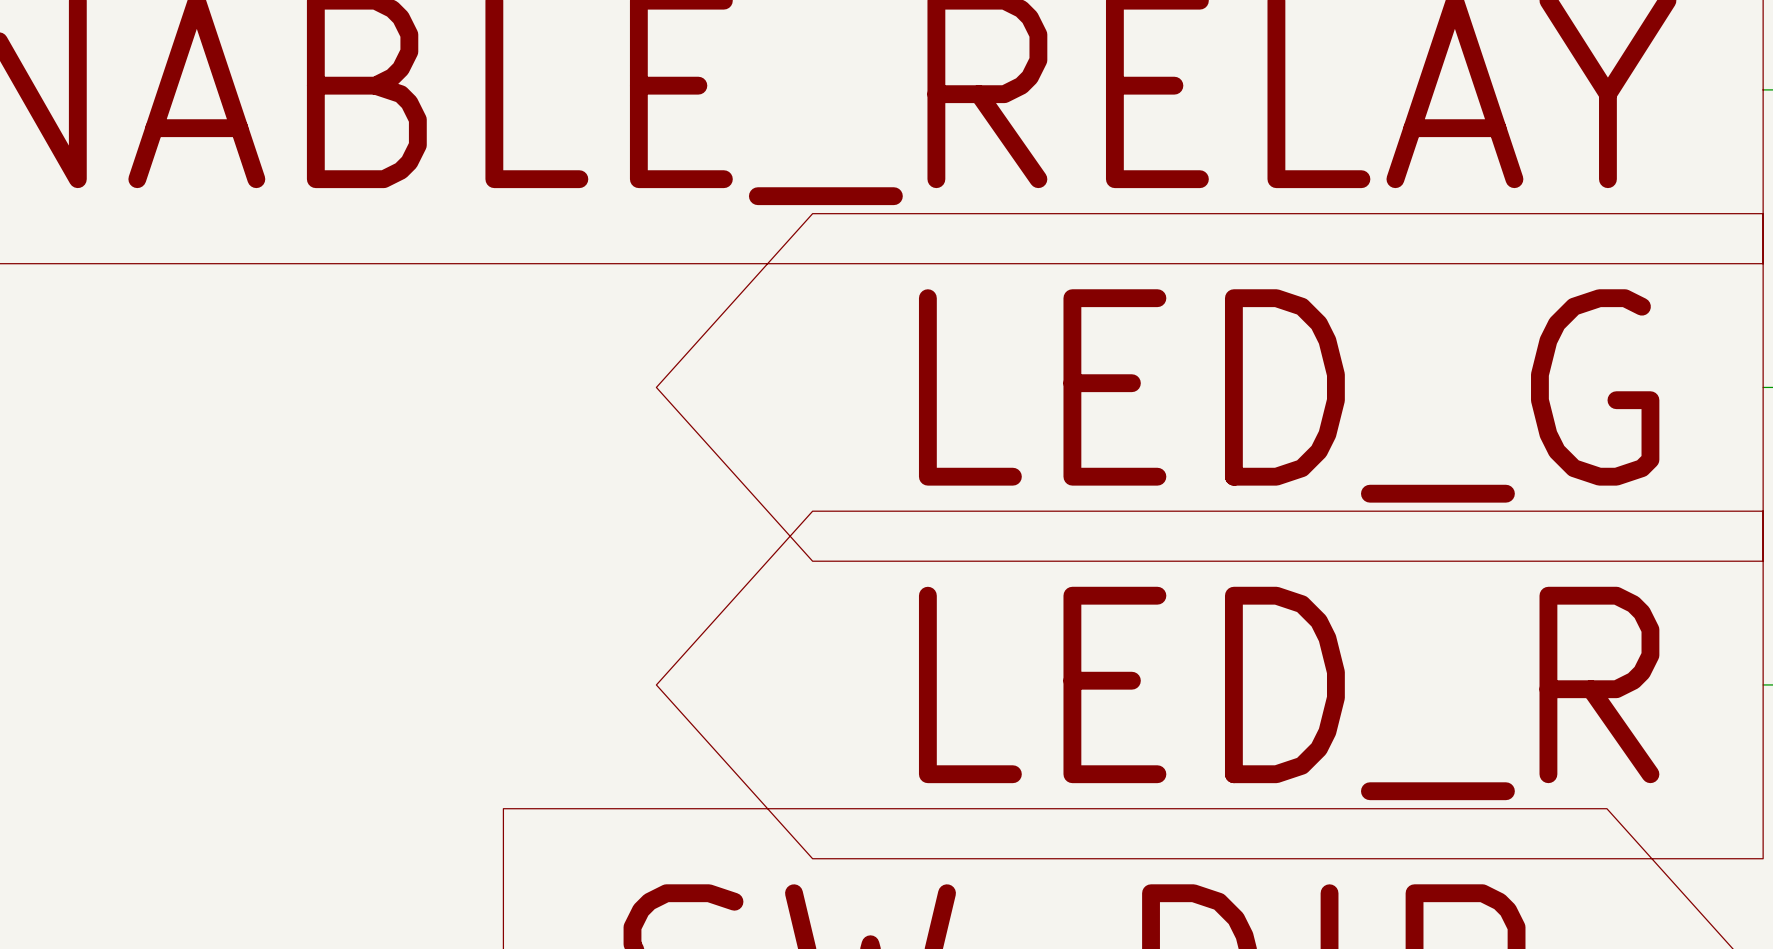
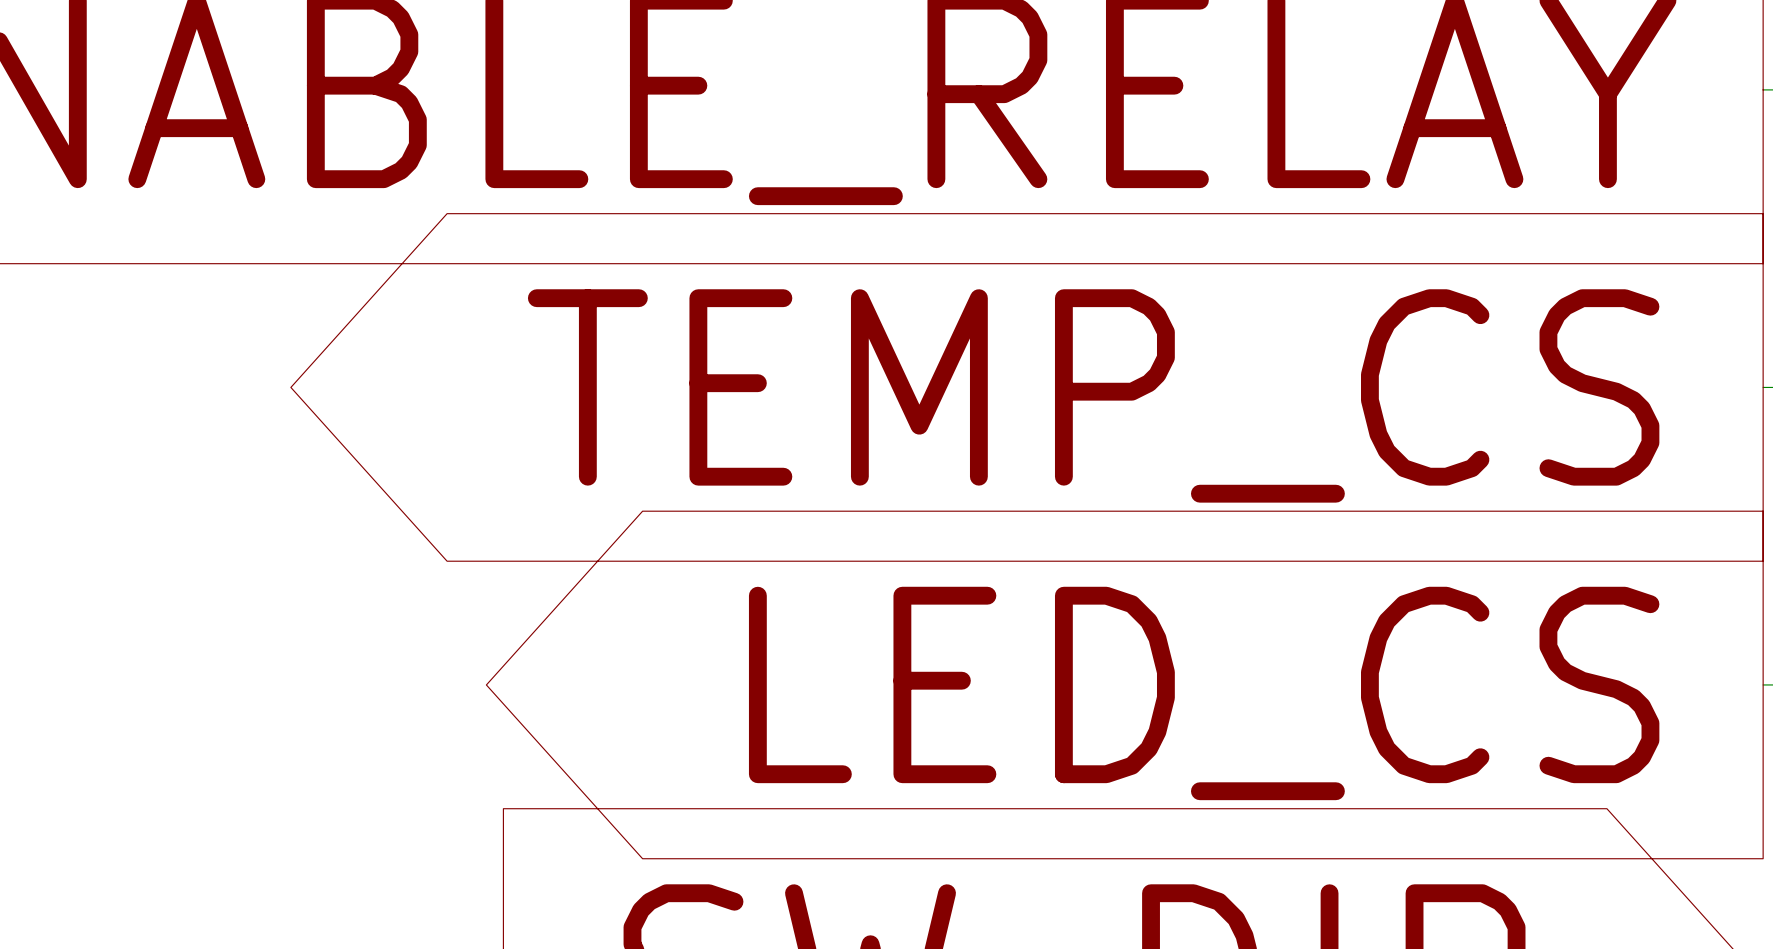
global label: LED_G (1289, 395) -> TEMP_CS (1093, 395)
global label: LED_R (1289, 693) -> LED_CS (1204, 693)

